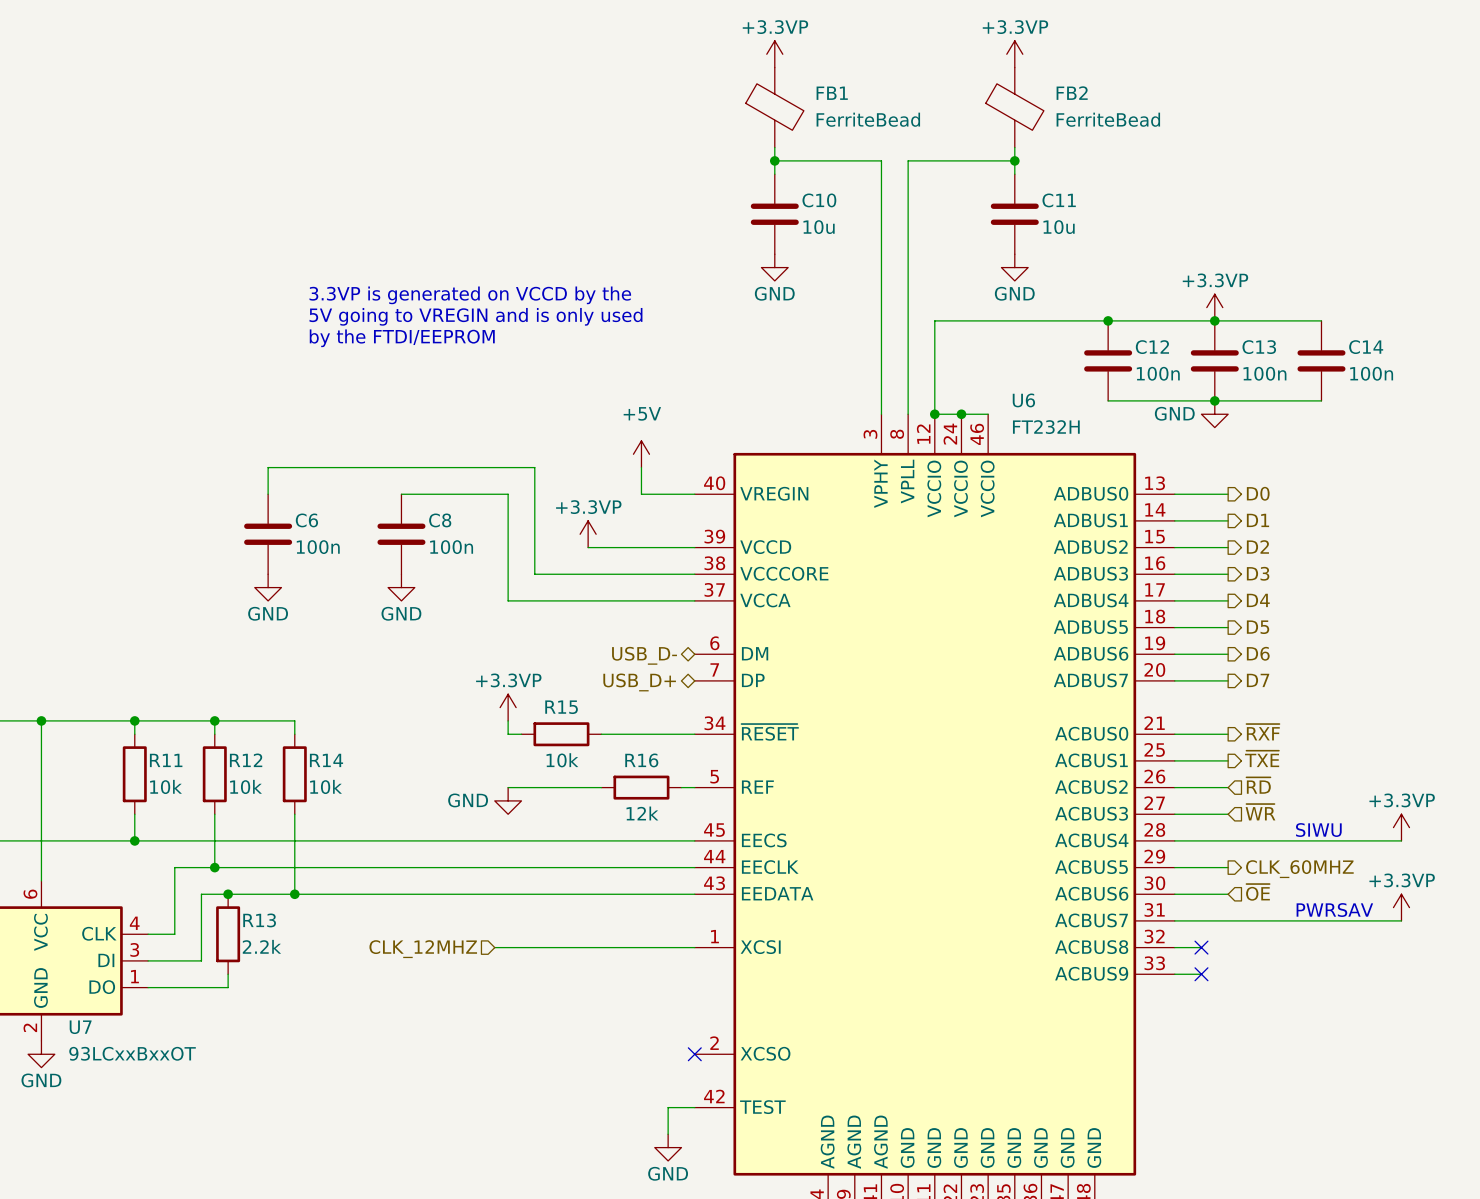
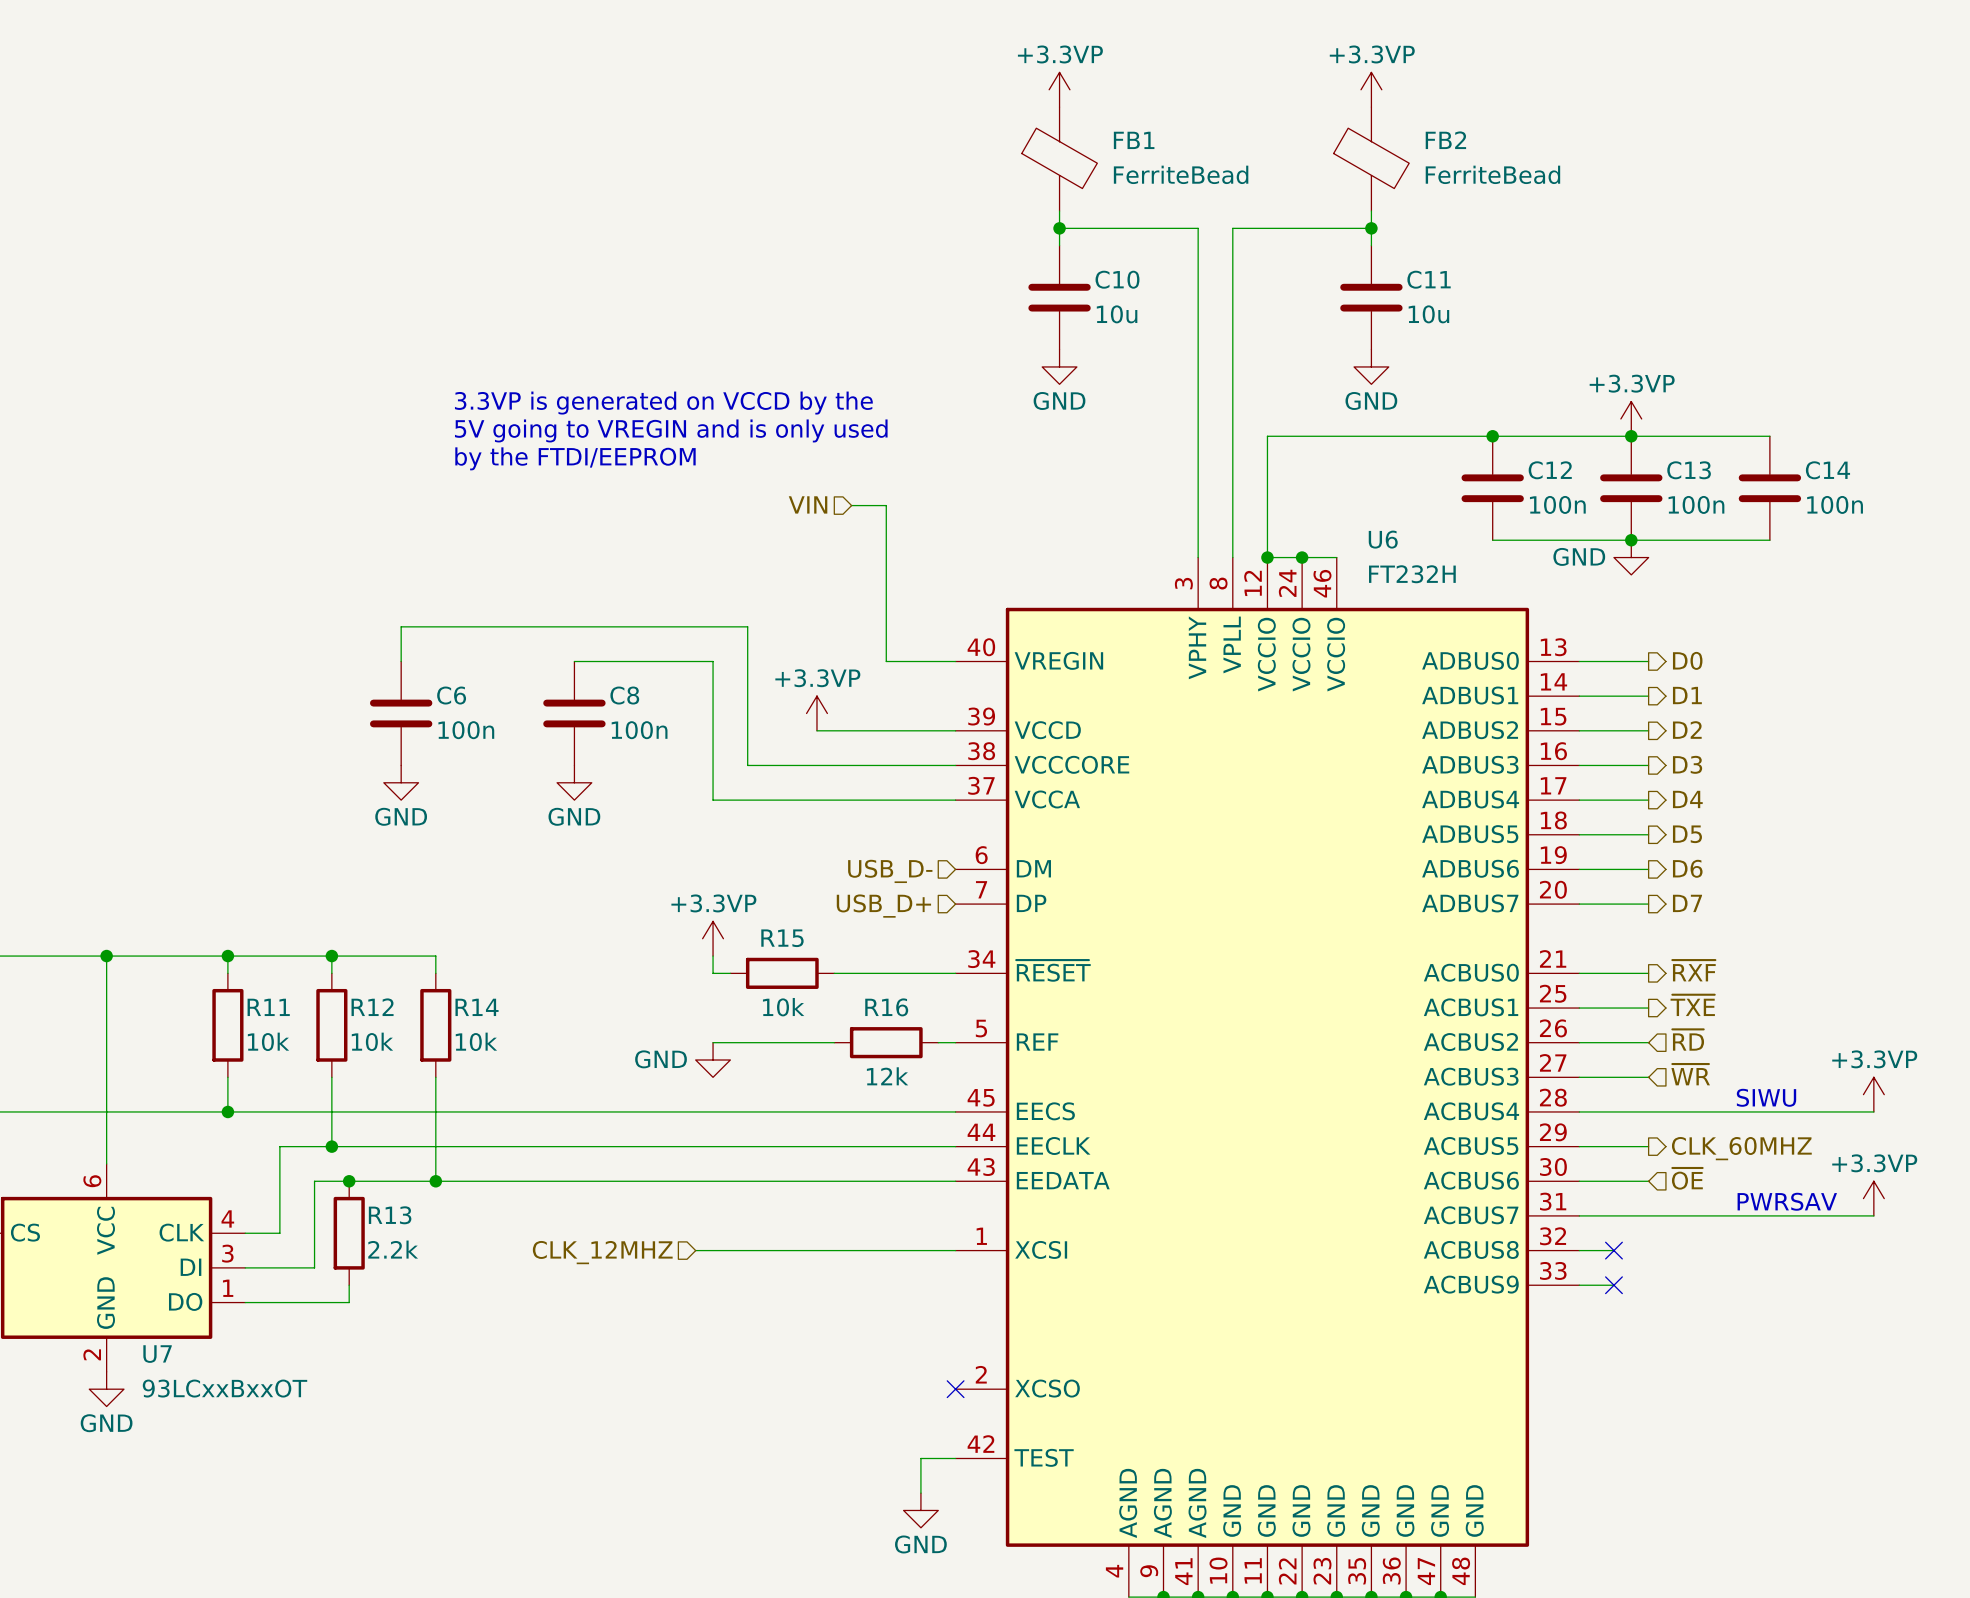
hierarchical label: none -> VIN (808, 504)
wire: none -> (851, 505) (886, 505) (886, 626)
power symbol: +5V (641, 454) -> none
hierarchical label shape: bidirectional (644, 655) -> input (890, 871)
hierarchical label shape: bidirectional (639, 682) -> input (883, 906)

